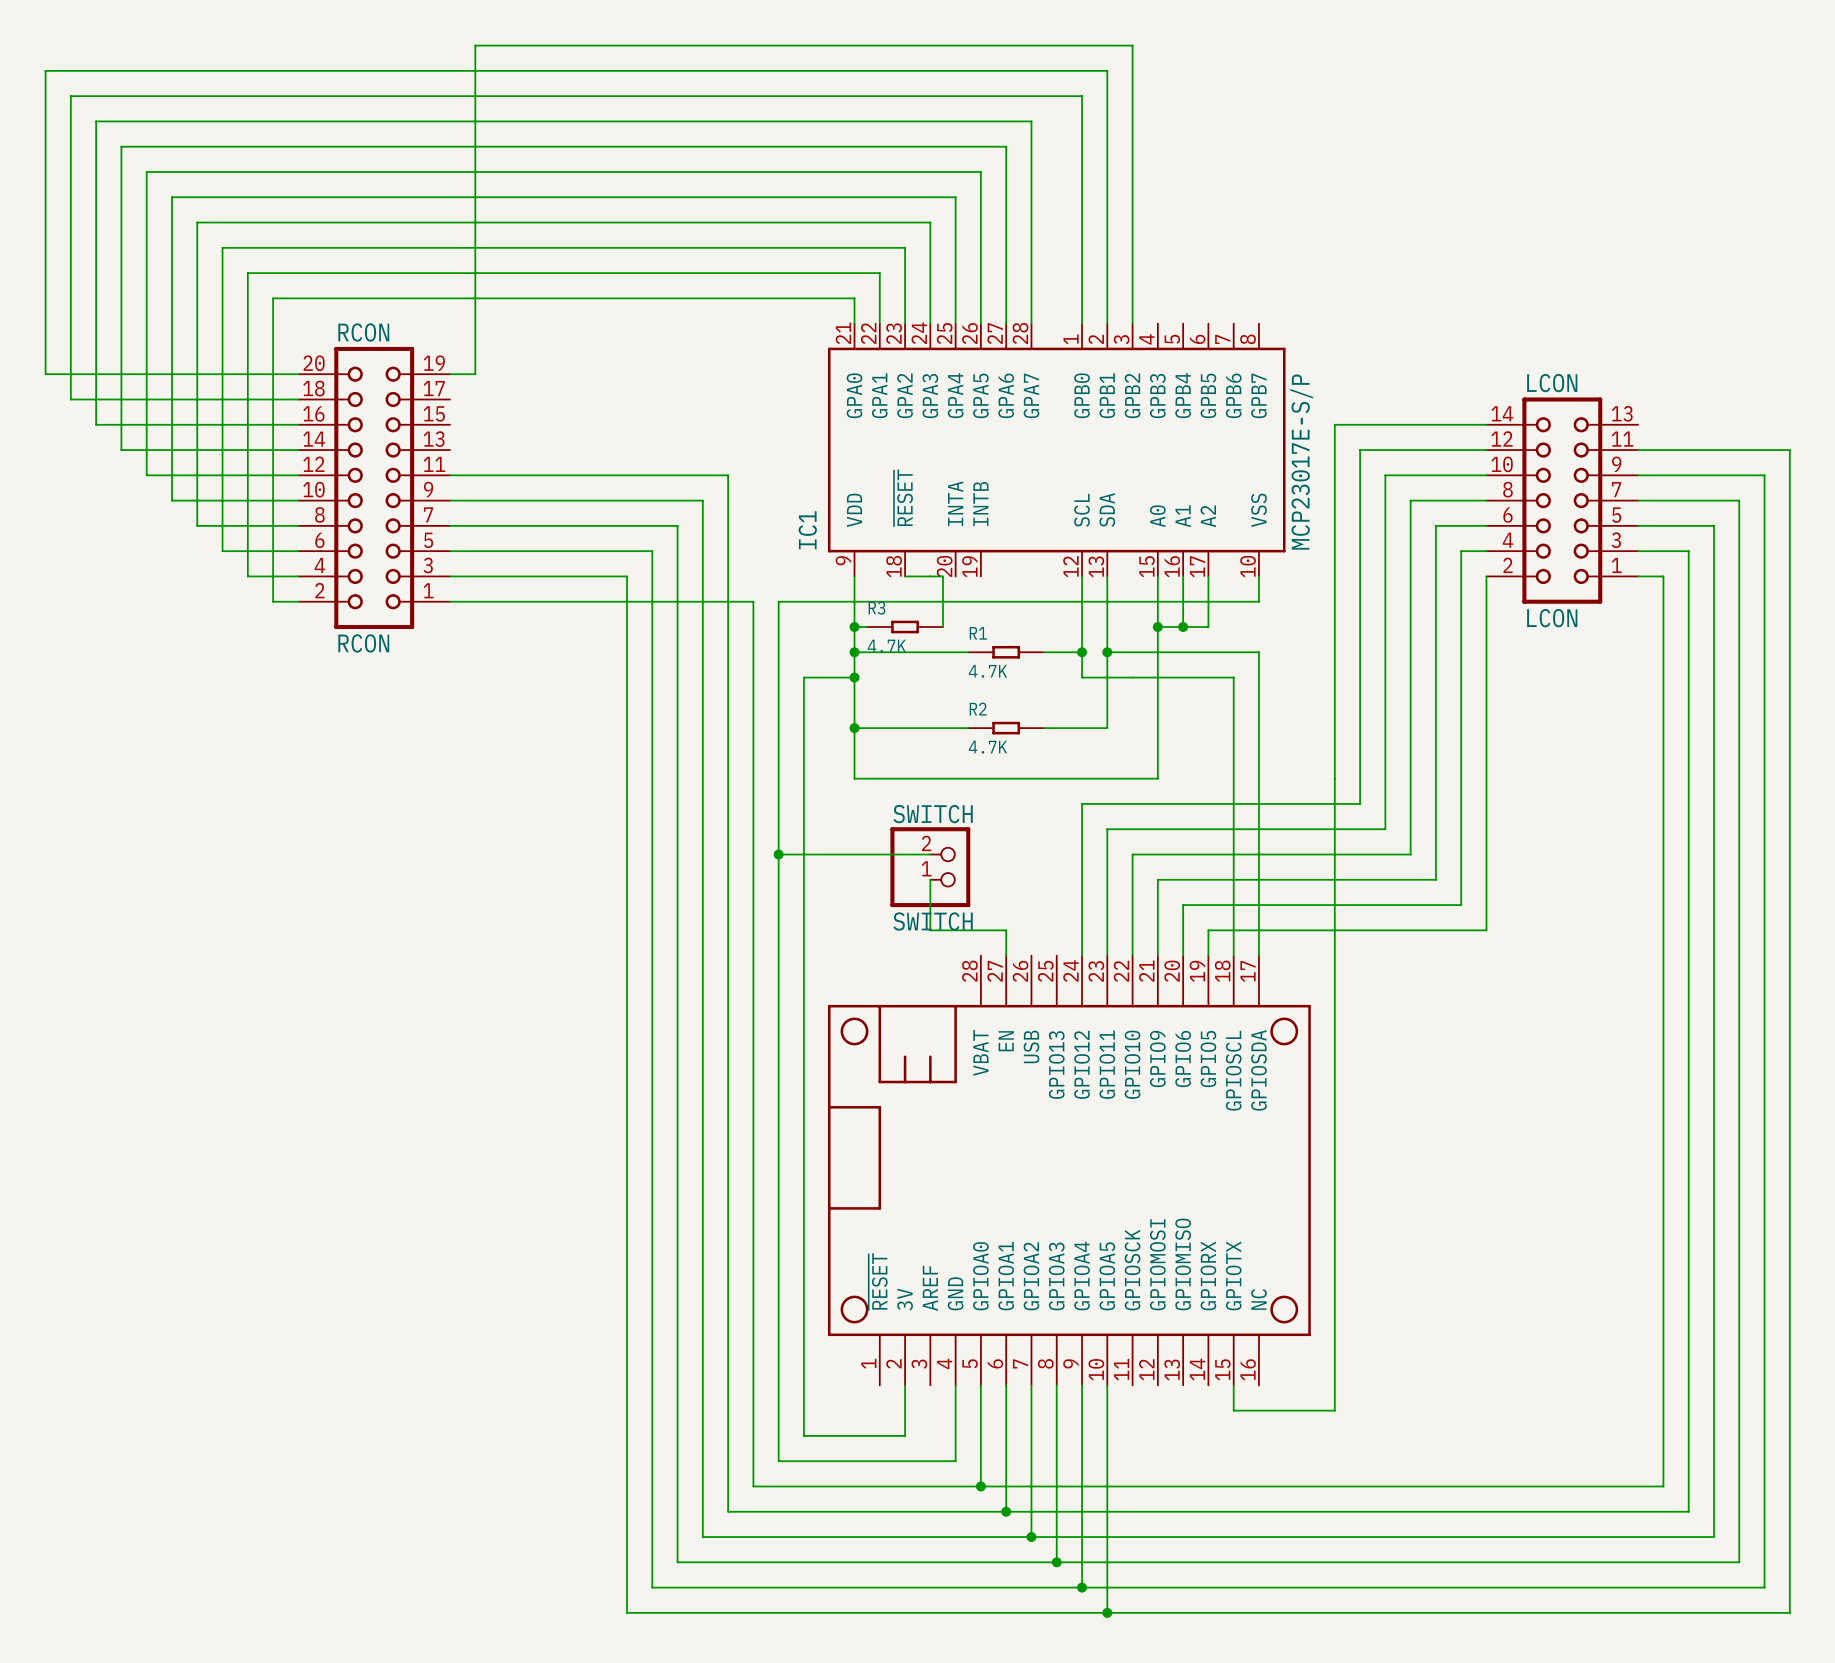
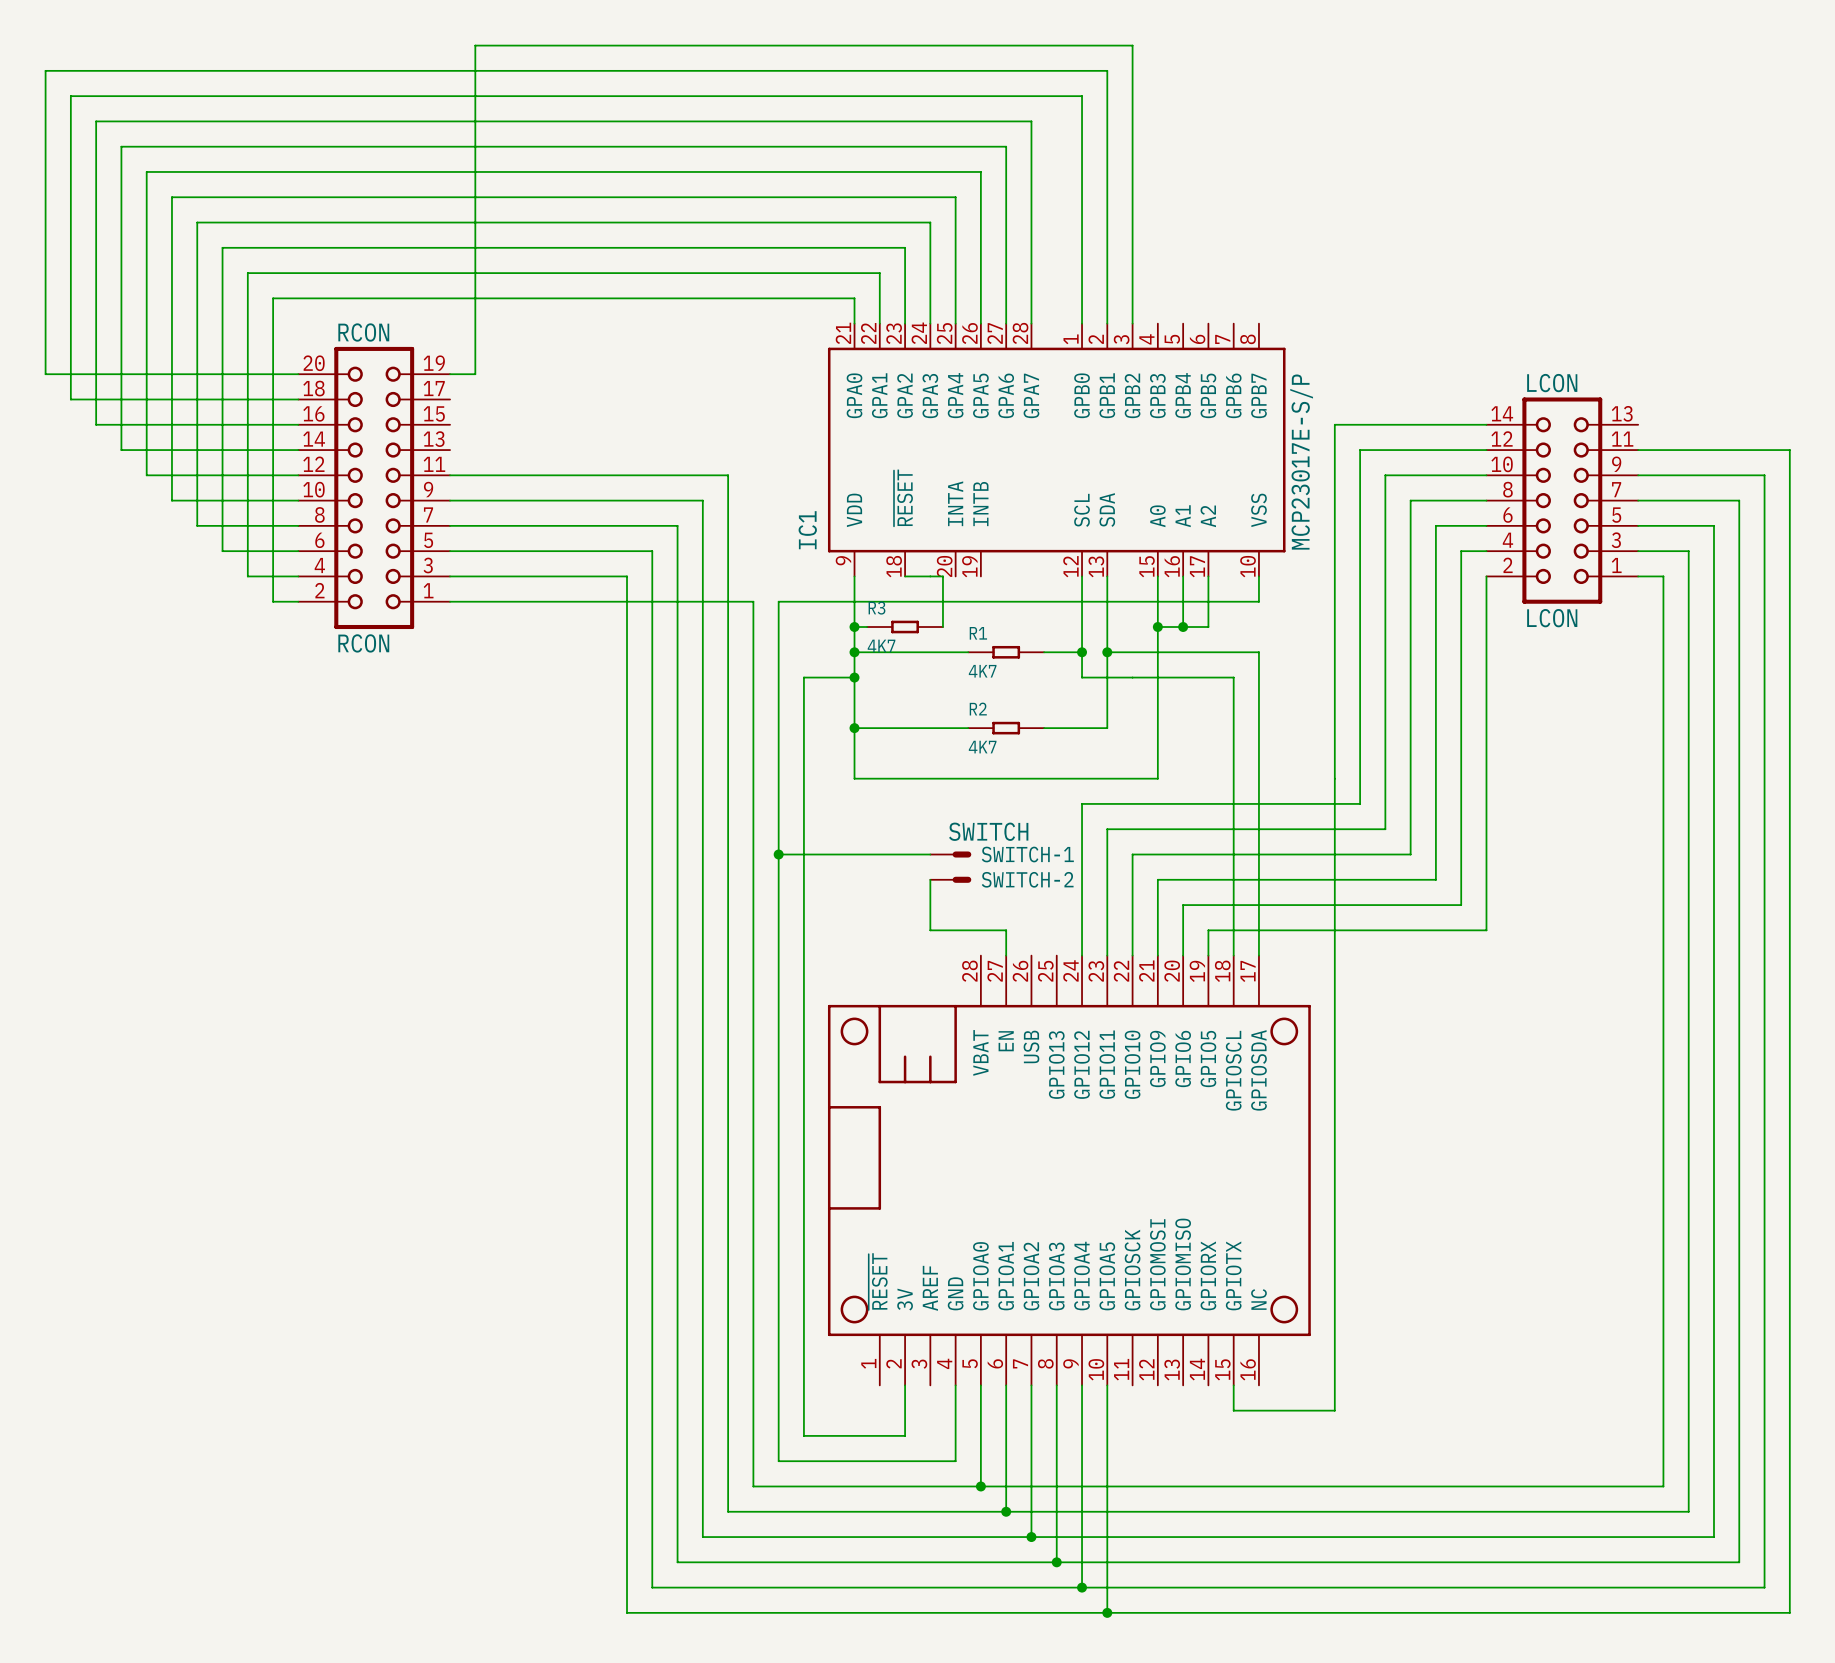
R3 value: 4.7K (886, 646) -> 4K7 (881, 645)
R1 value: 4.7K (987, 671) -> 4K7 (982, 671)
R2 value: 4.7K (987, 747) -> 4K7 (982, 747)
SWITCH-1: none -> SWITCH (950, 854)
SWITCH: SWITCH (930, 867) -> none
SWITCH-2: none -> (950, 879)

